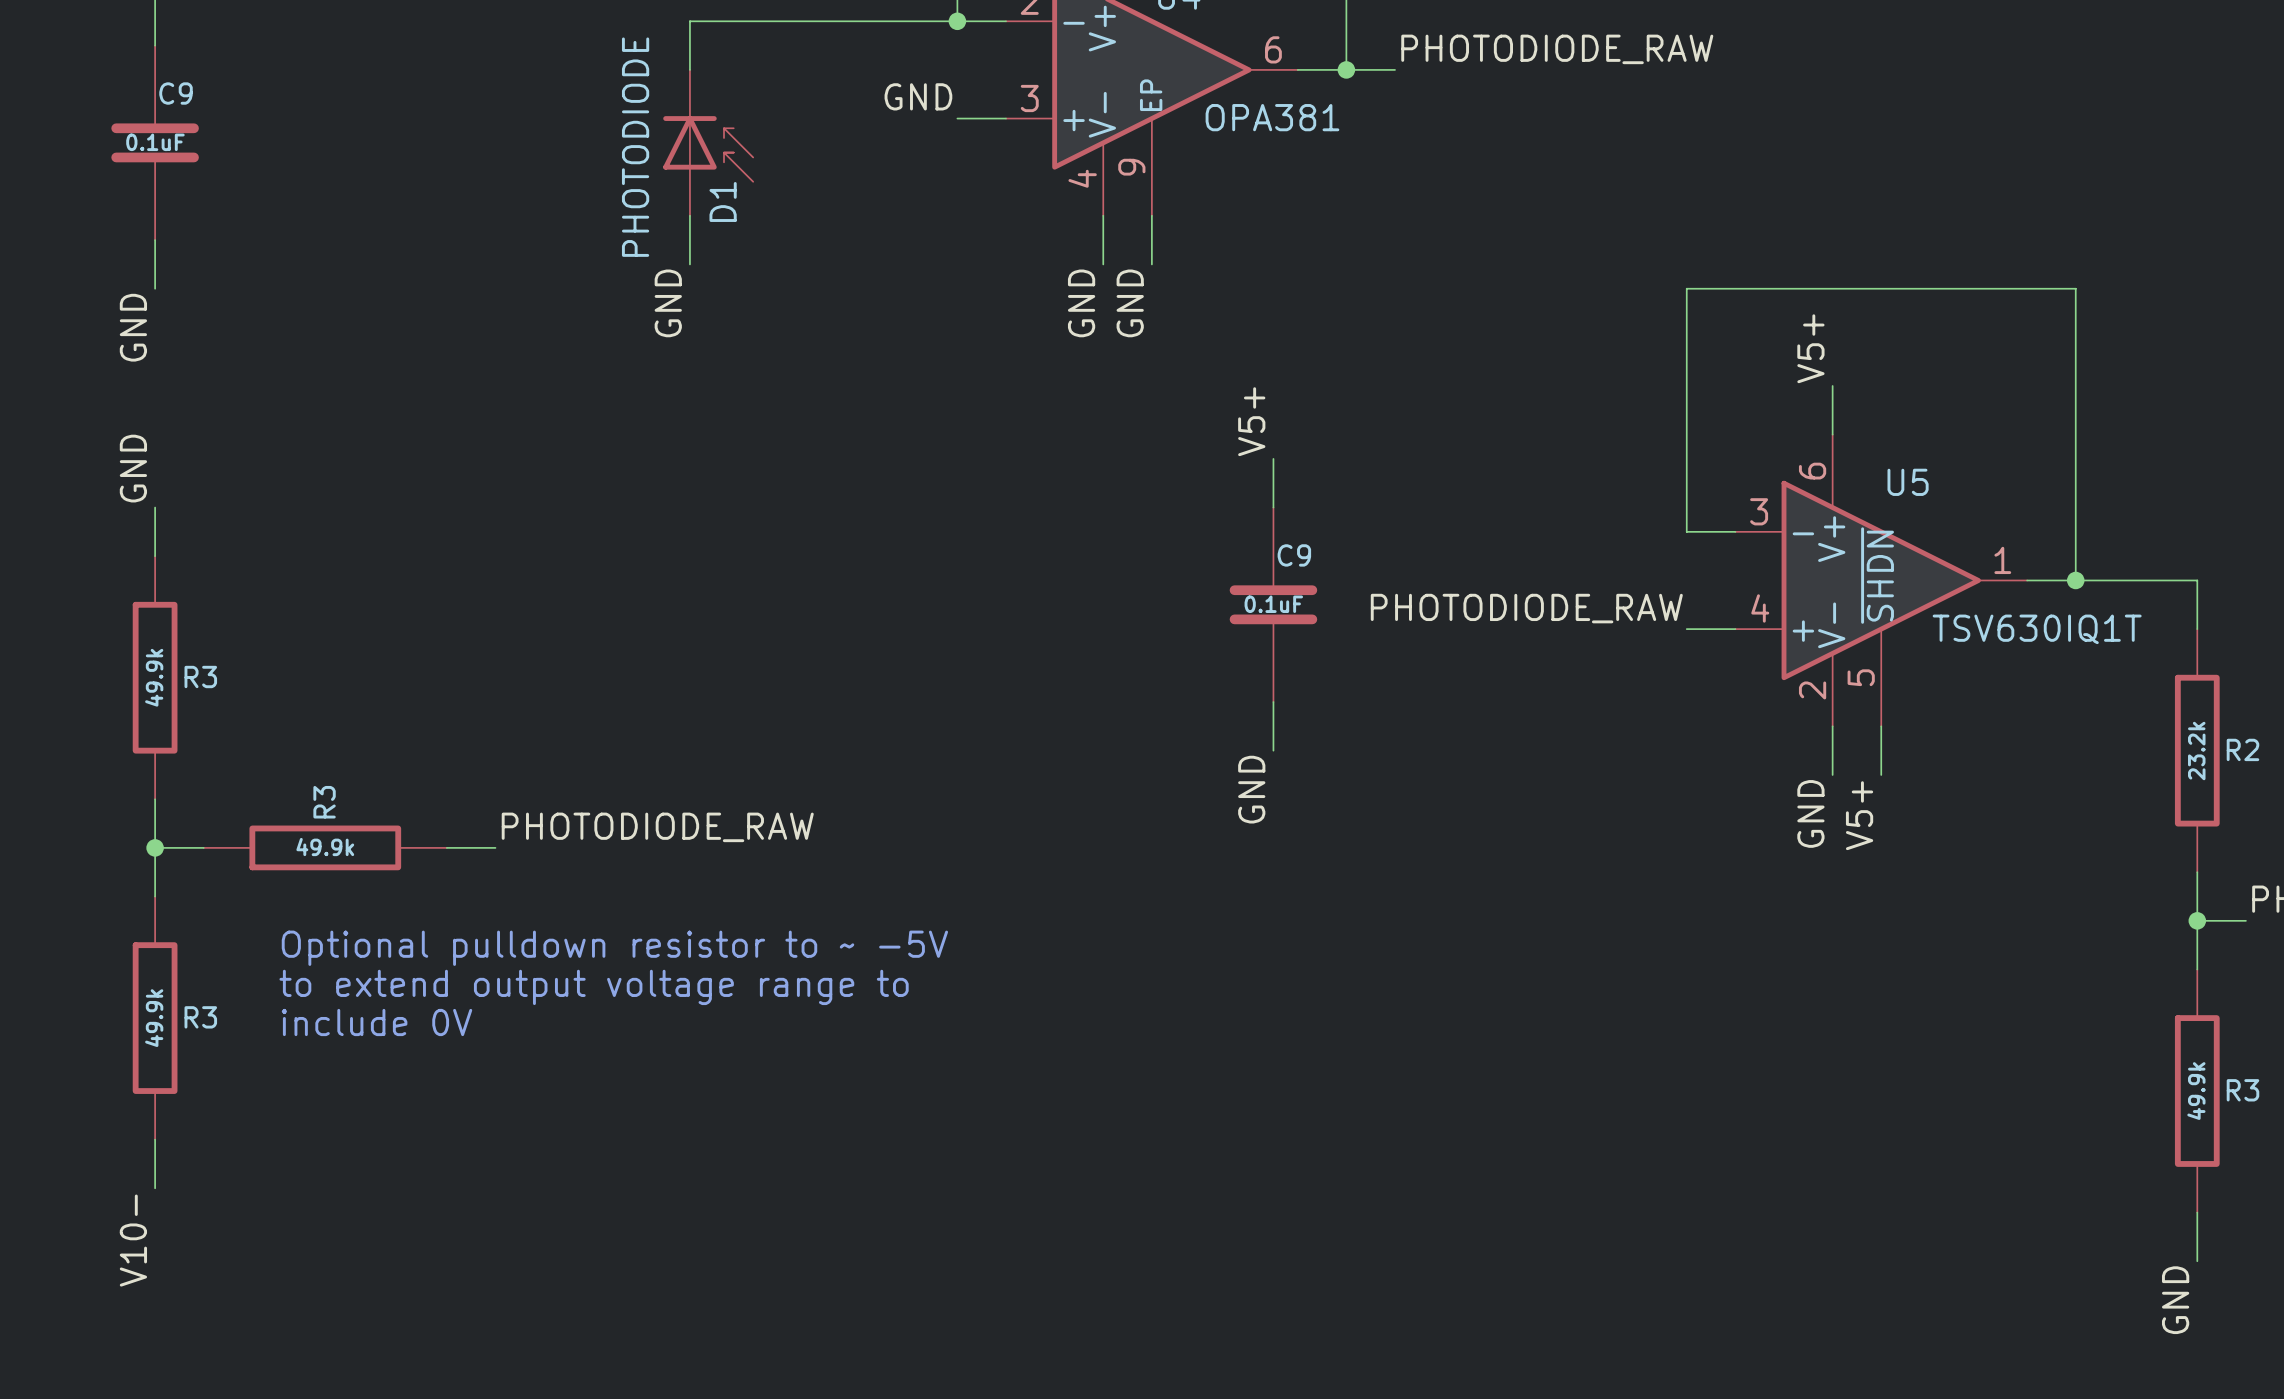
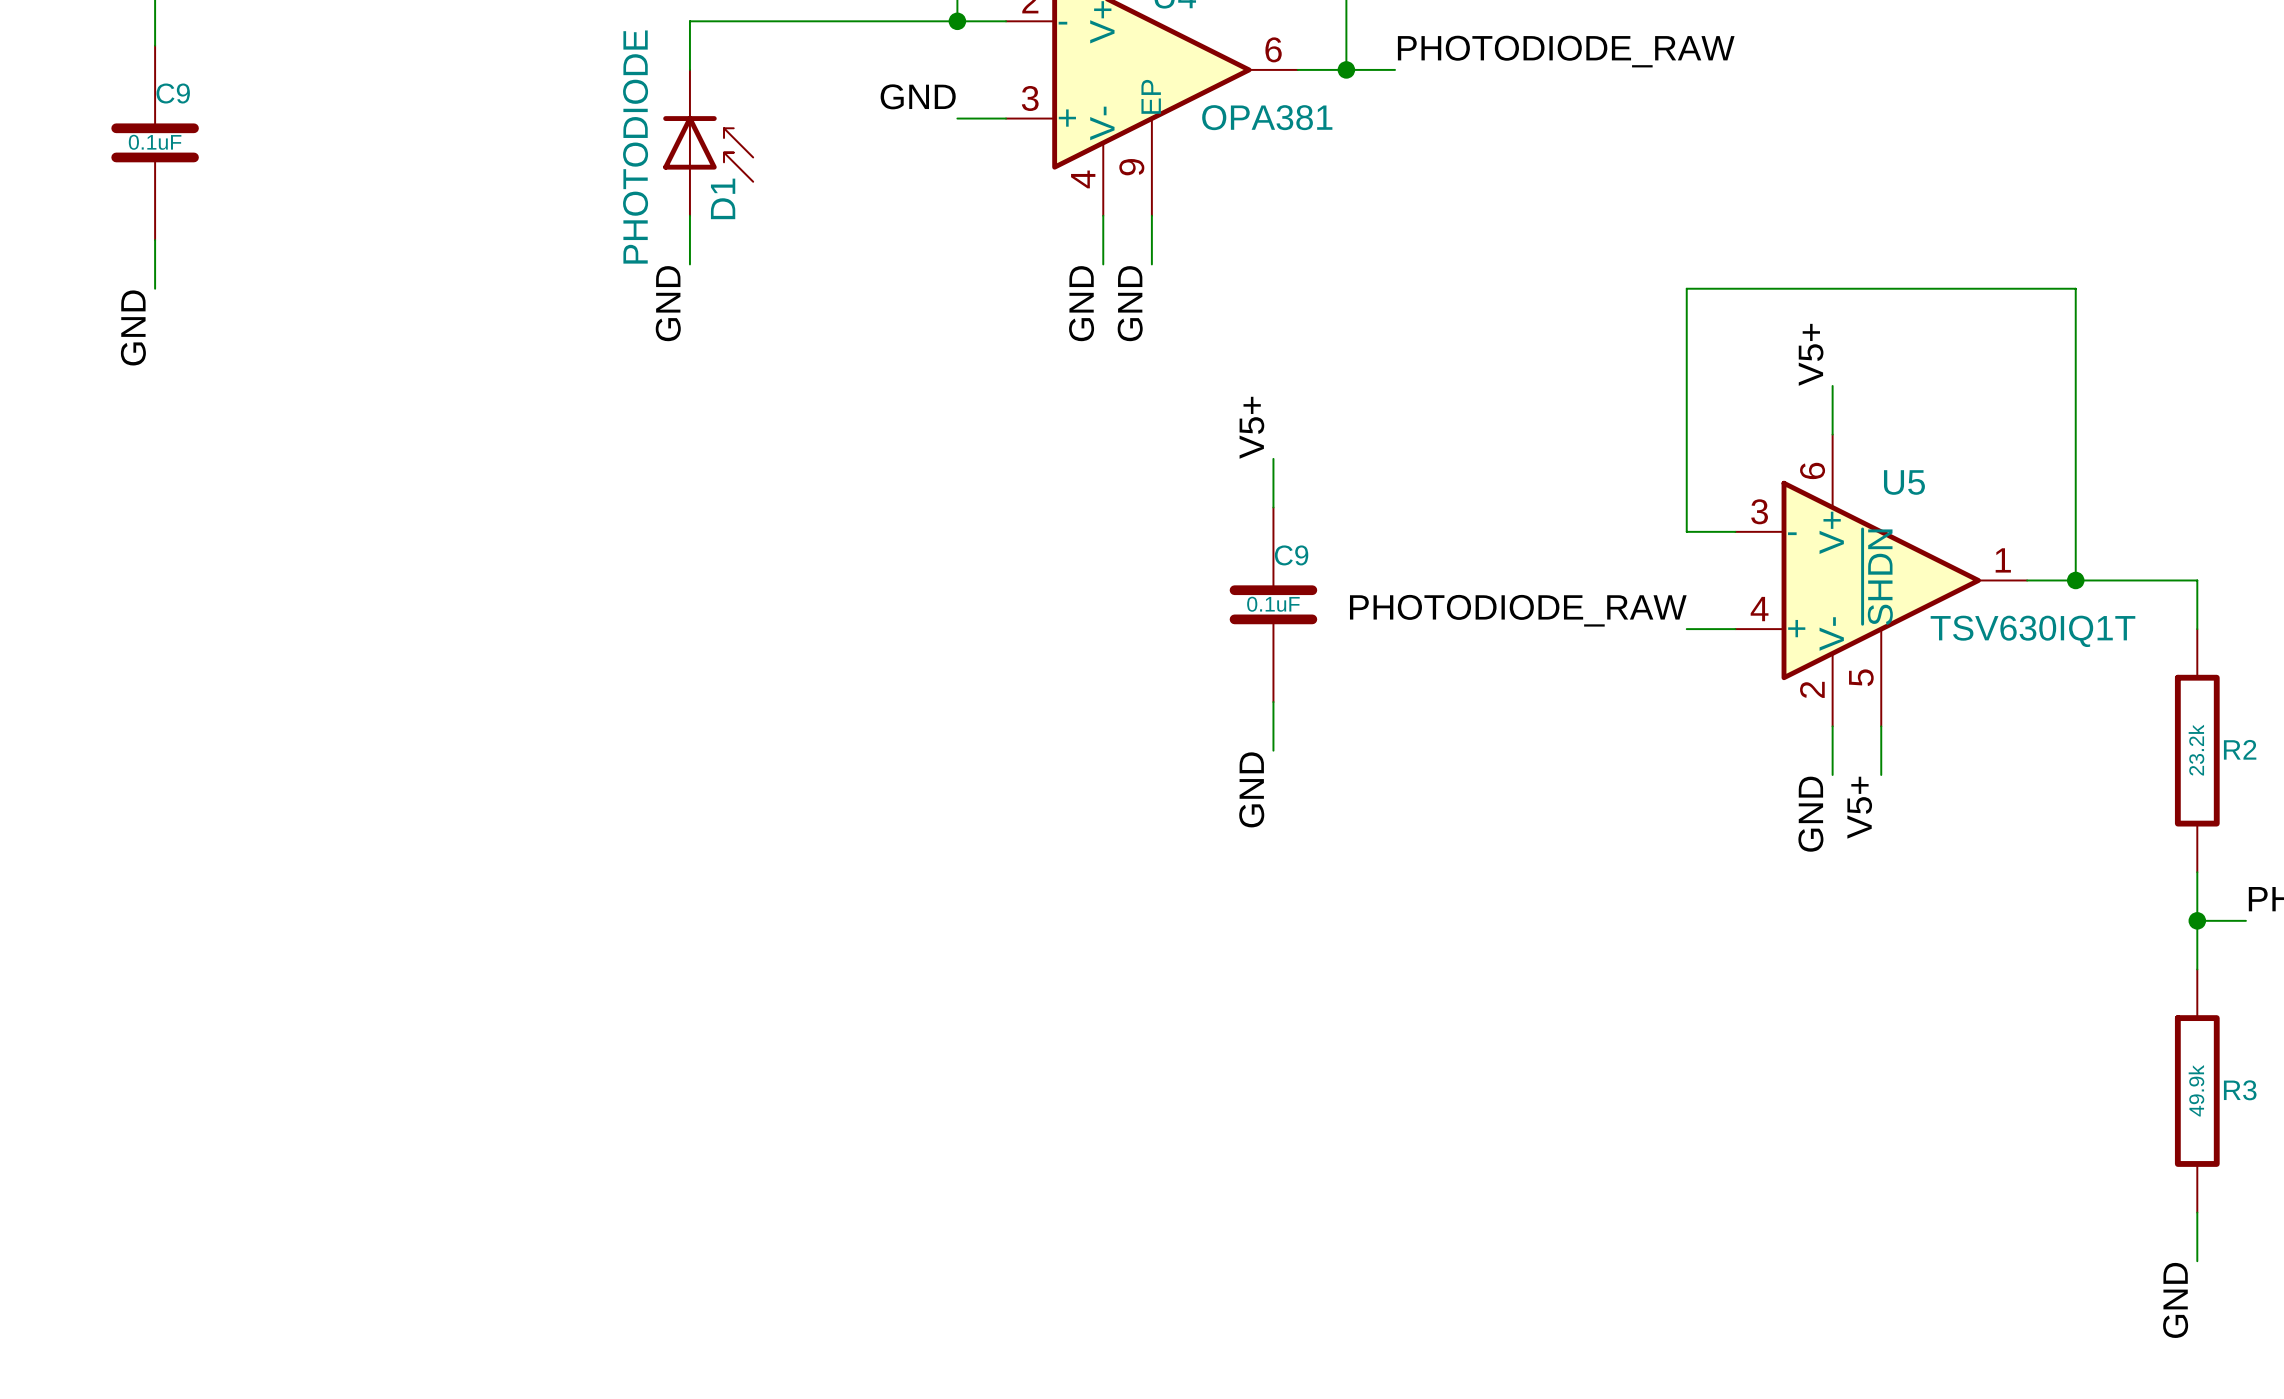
label: GND (133, 468) -> none
wire: (155, 507) (155, 556) -> none
R3: 49.9k (155, 677) -> none
wire: (155, 799) (155, 896) -> none
label: PHOTODIODE_RAW (657, 827) -> none
wire: (155, 847) (203, 847) -> none
junction: (155, 847) -> none
R3: 49.9k (325, 847) -> none
wire: (446, 847) (495, 847) -> none
text: Optional pulldown resistor to ~ -5V (614, 948) -> none
text: to extend output voltage range to (594, 987) -> none
R3: 49.9k (155, 1018) -> none
text: include 0V (376, 1022) -> none
wire: (155, 1139) (155, 1188) -> none
label: V10- (133, 1240) -> none

